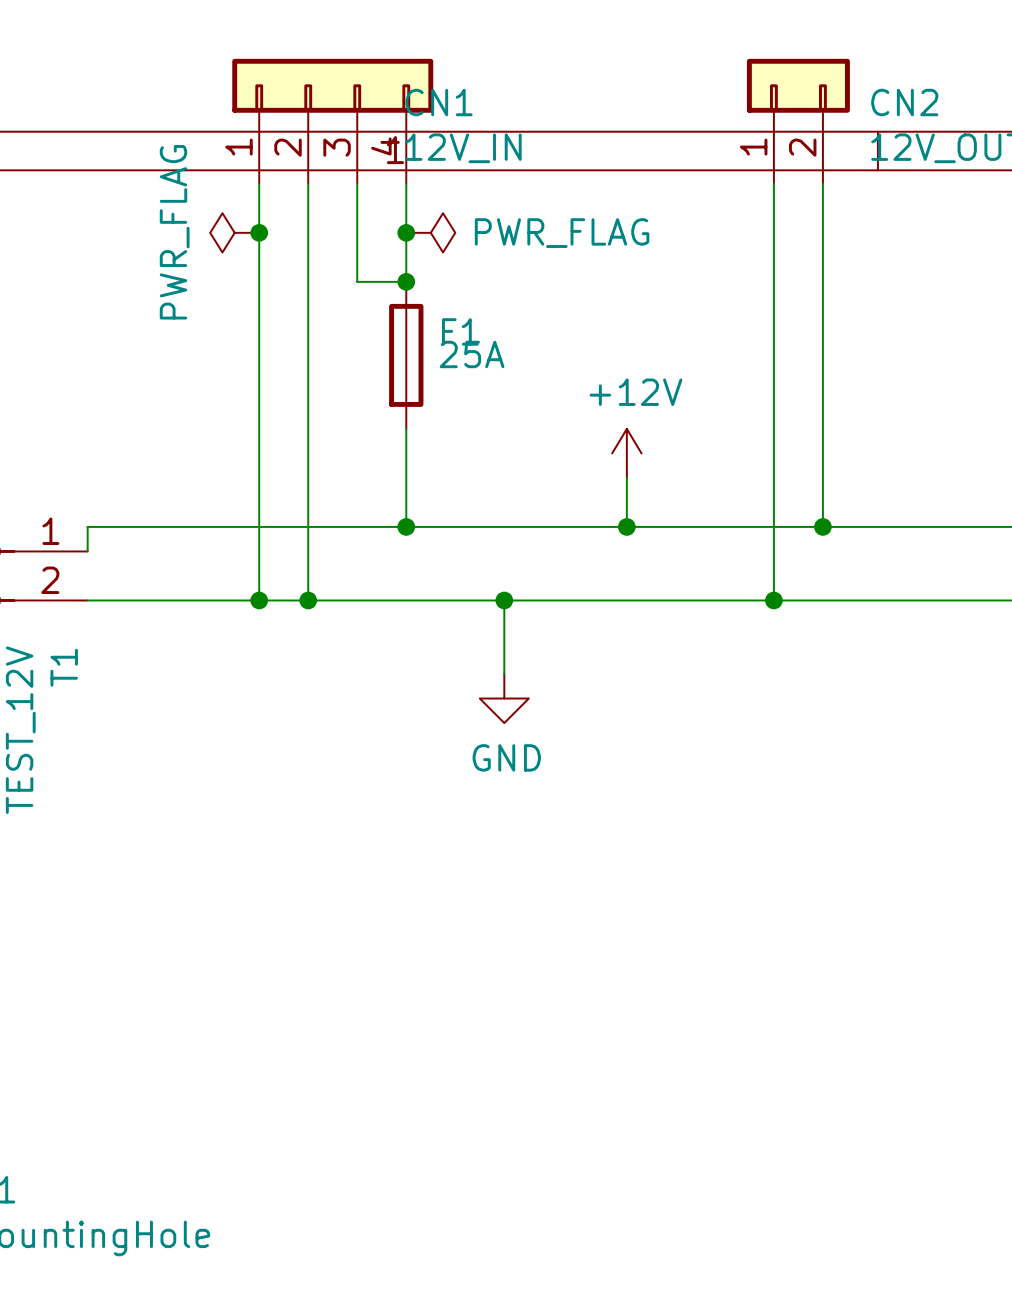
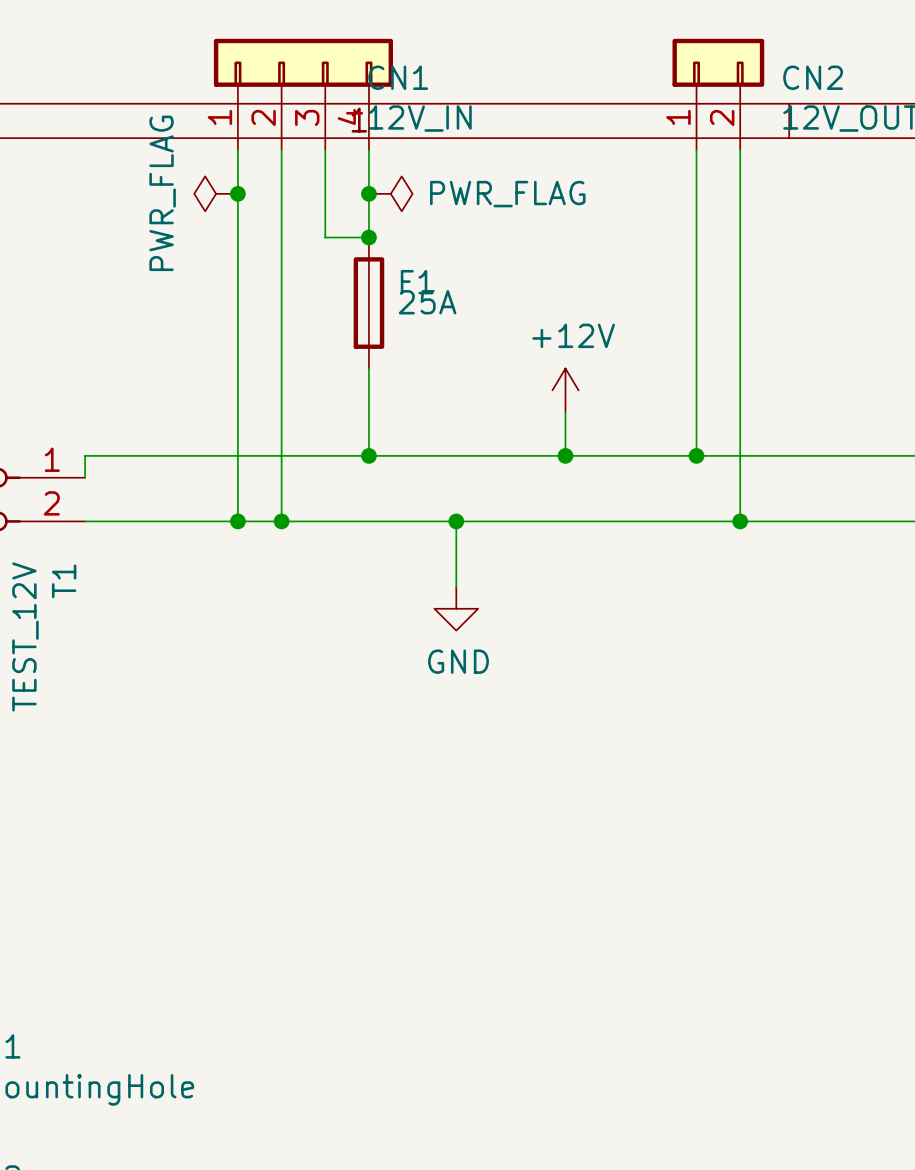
wire: (773, 526) (773, 600) -> (740, 455) (740, 521)
junction: none -> (696, 455)
junction: (822, 526) -> none
junction: (773, 600) -> none
junction: none -> (740, 521)

